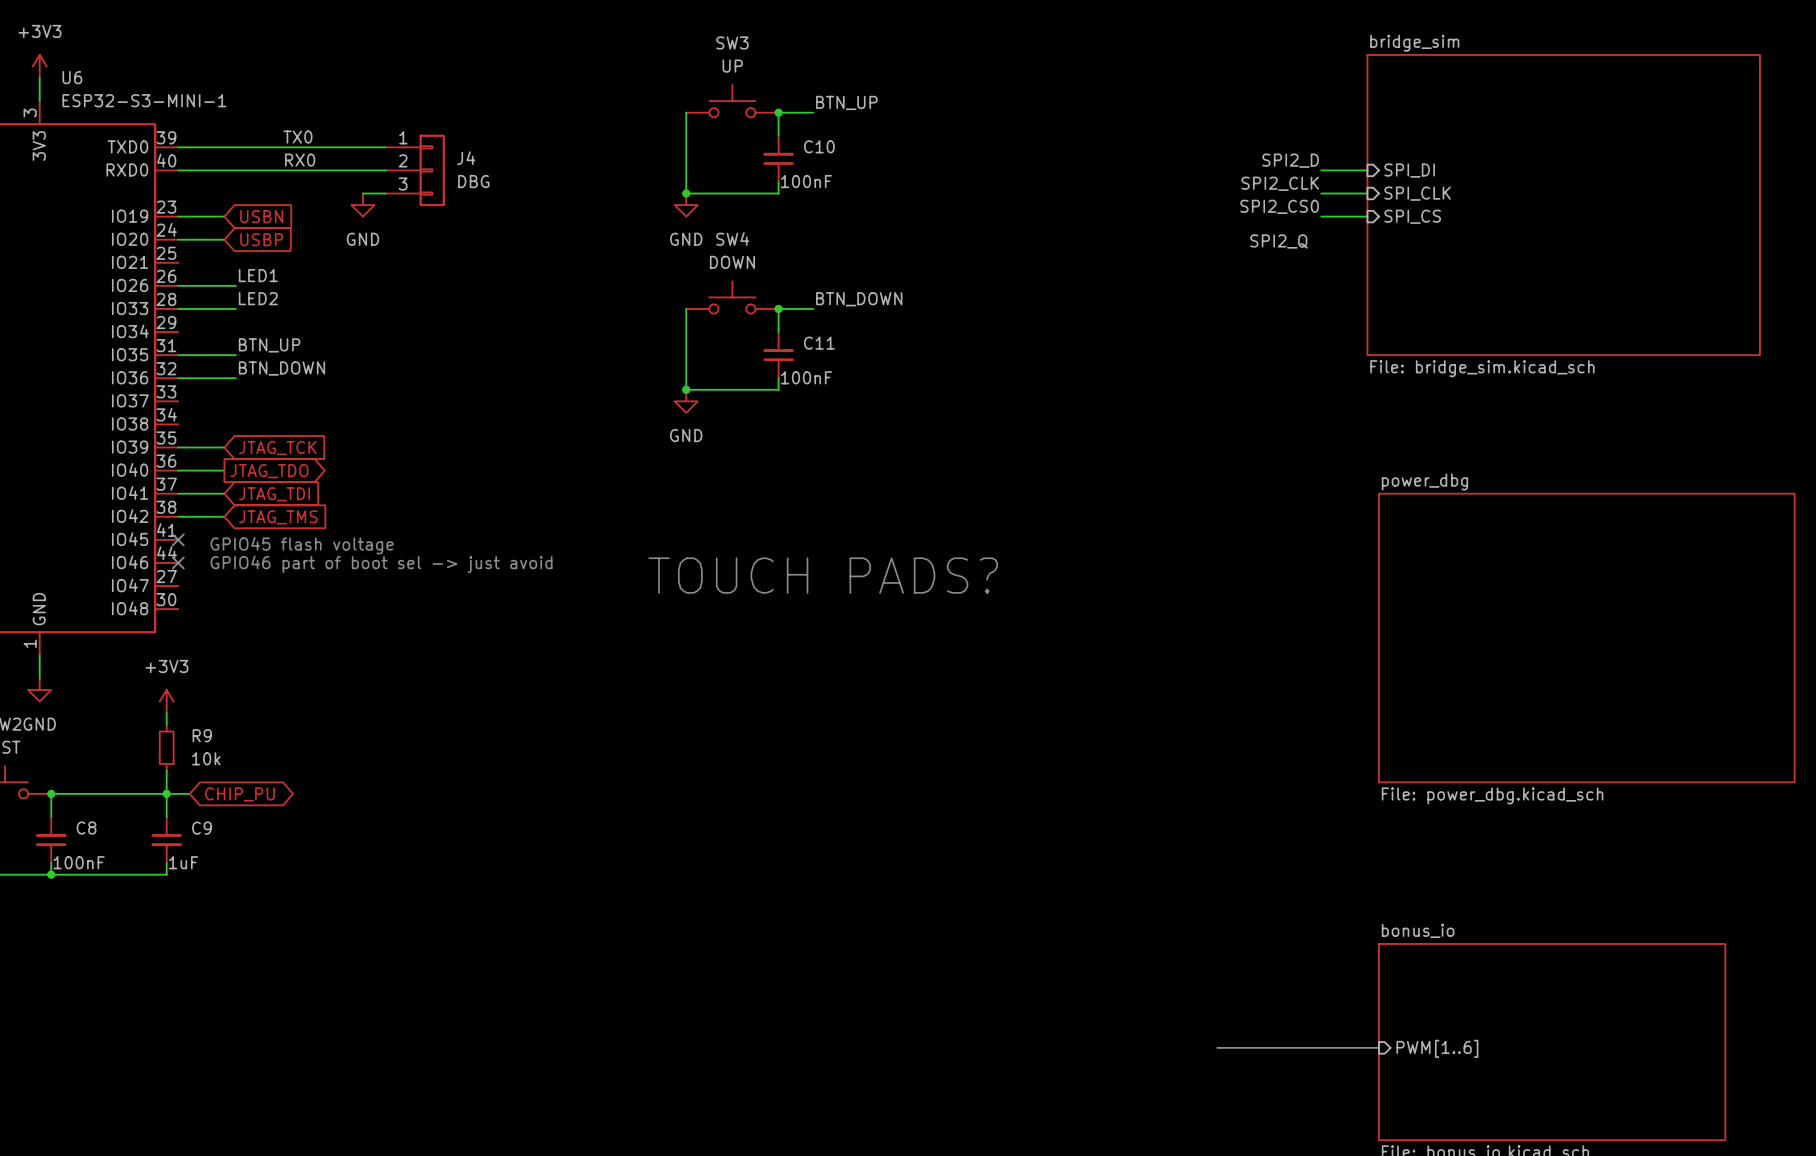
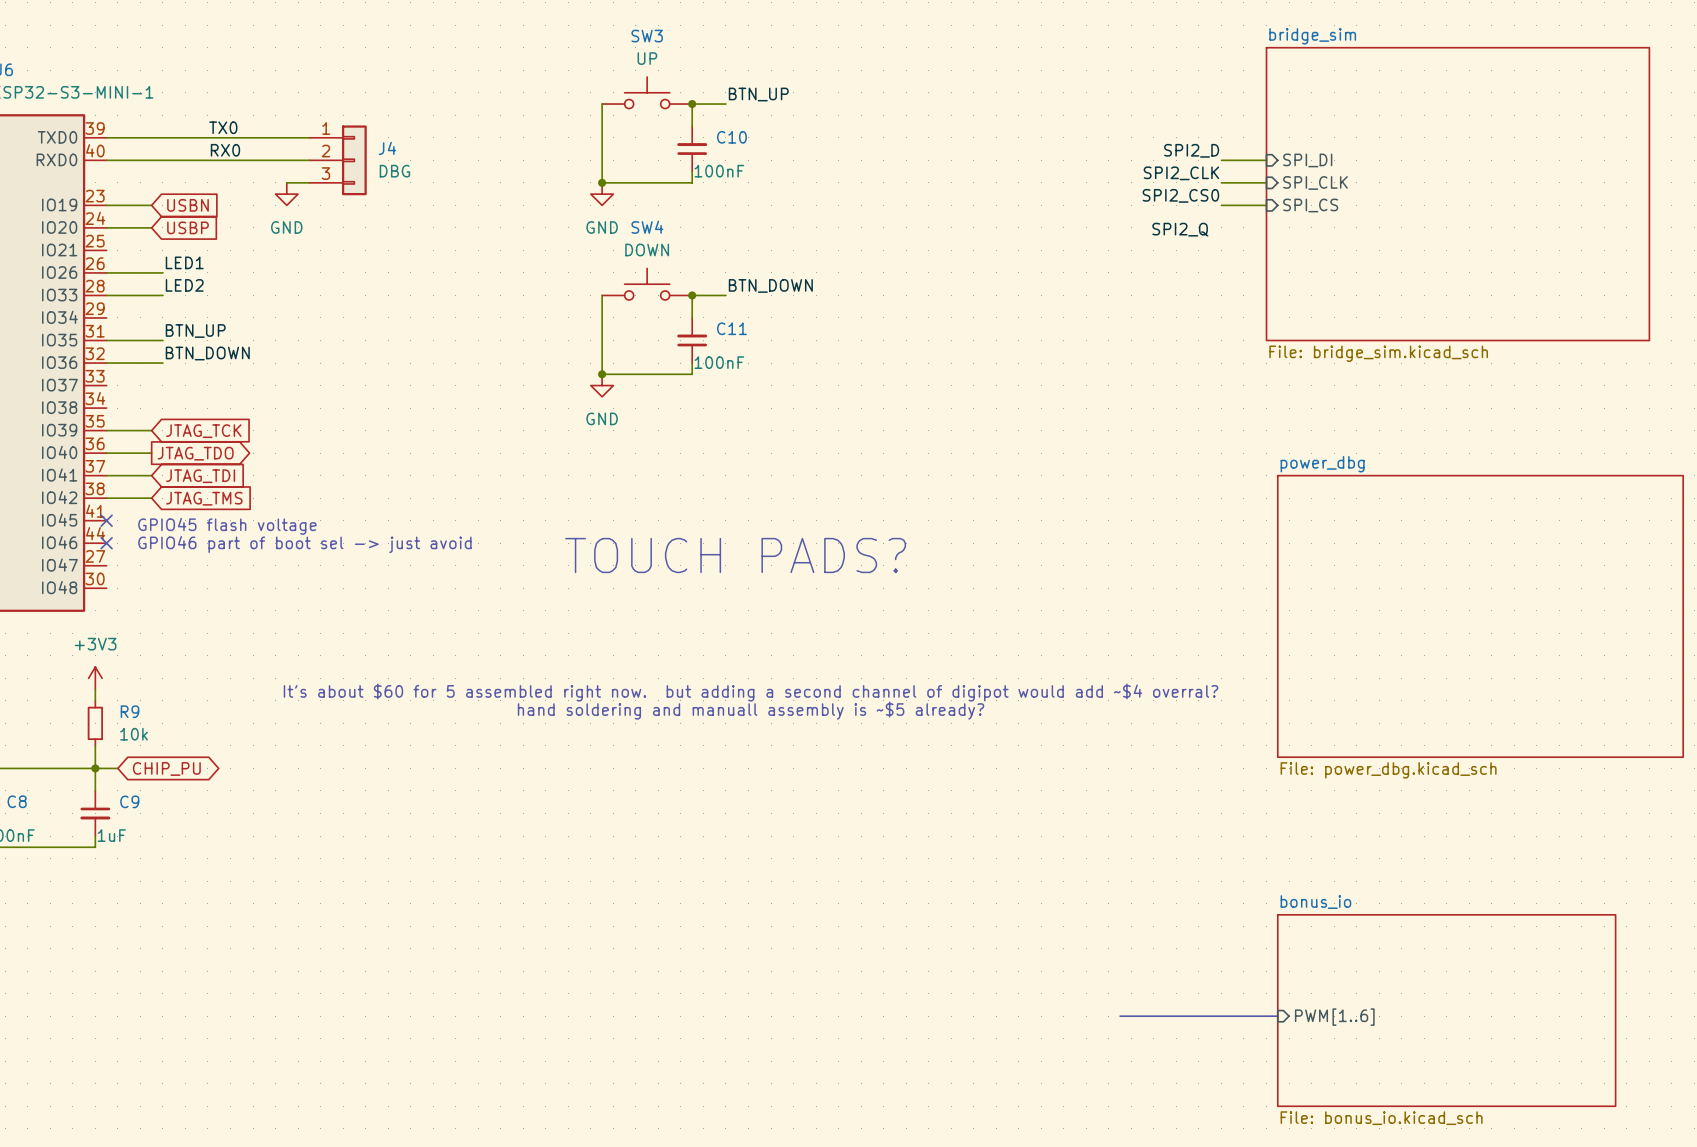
text: none -> It's about $60 for 5 assembled right now. but adding a second channel of digipot would add ~$4 overral? (751, 692)
text: none -> hand soldering and manuall assembly is ~$5 already? (751, 710)

